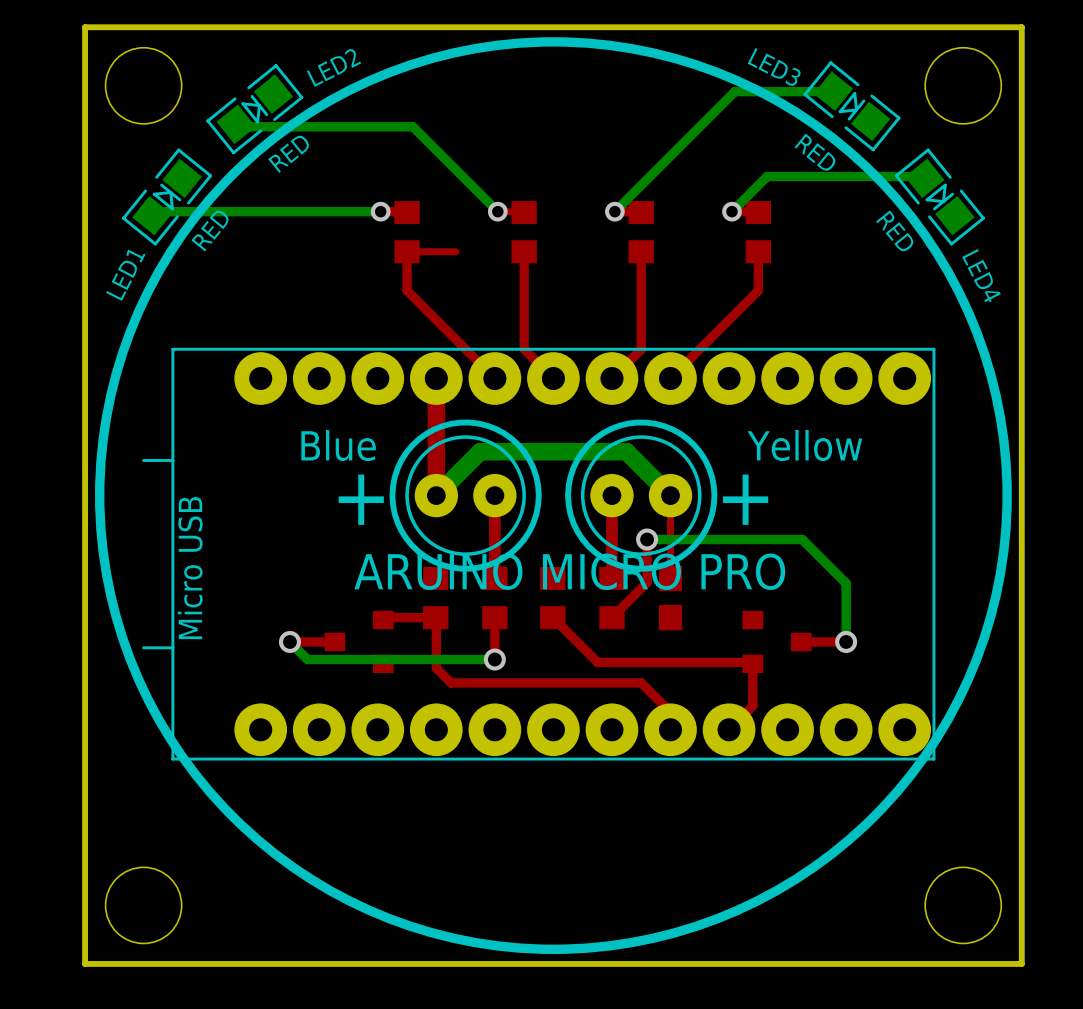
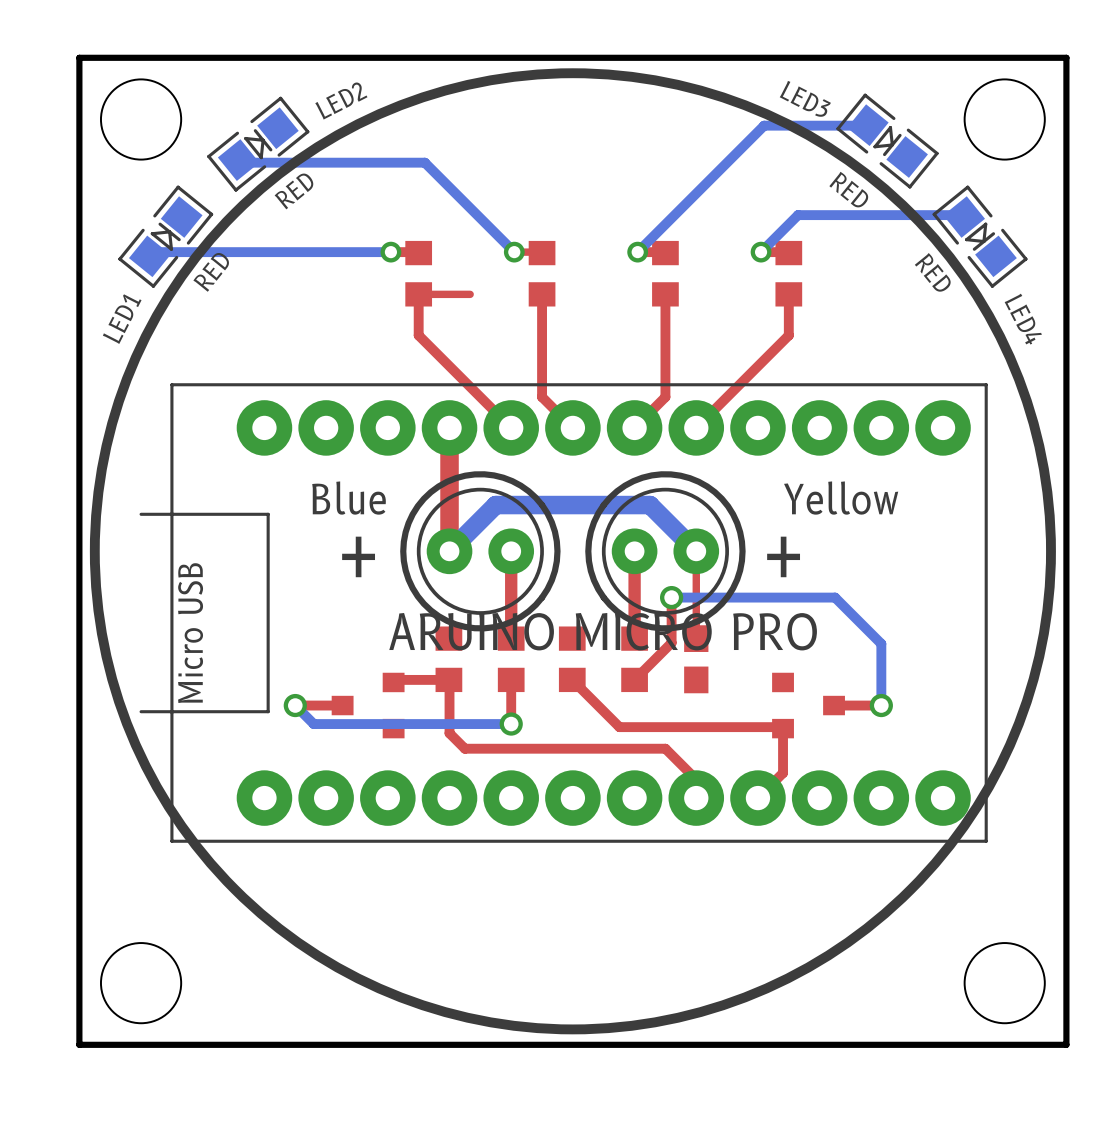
part footprint: [142, 347, 936, 761] -> [139, 383, 988, 843]

